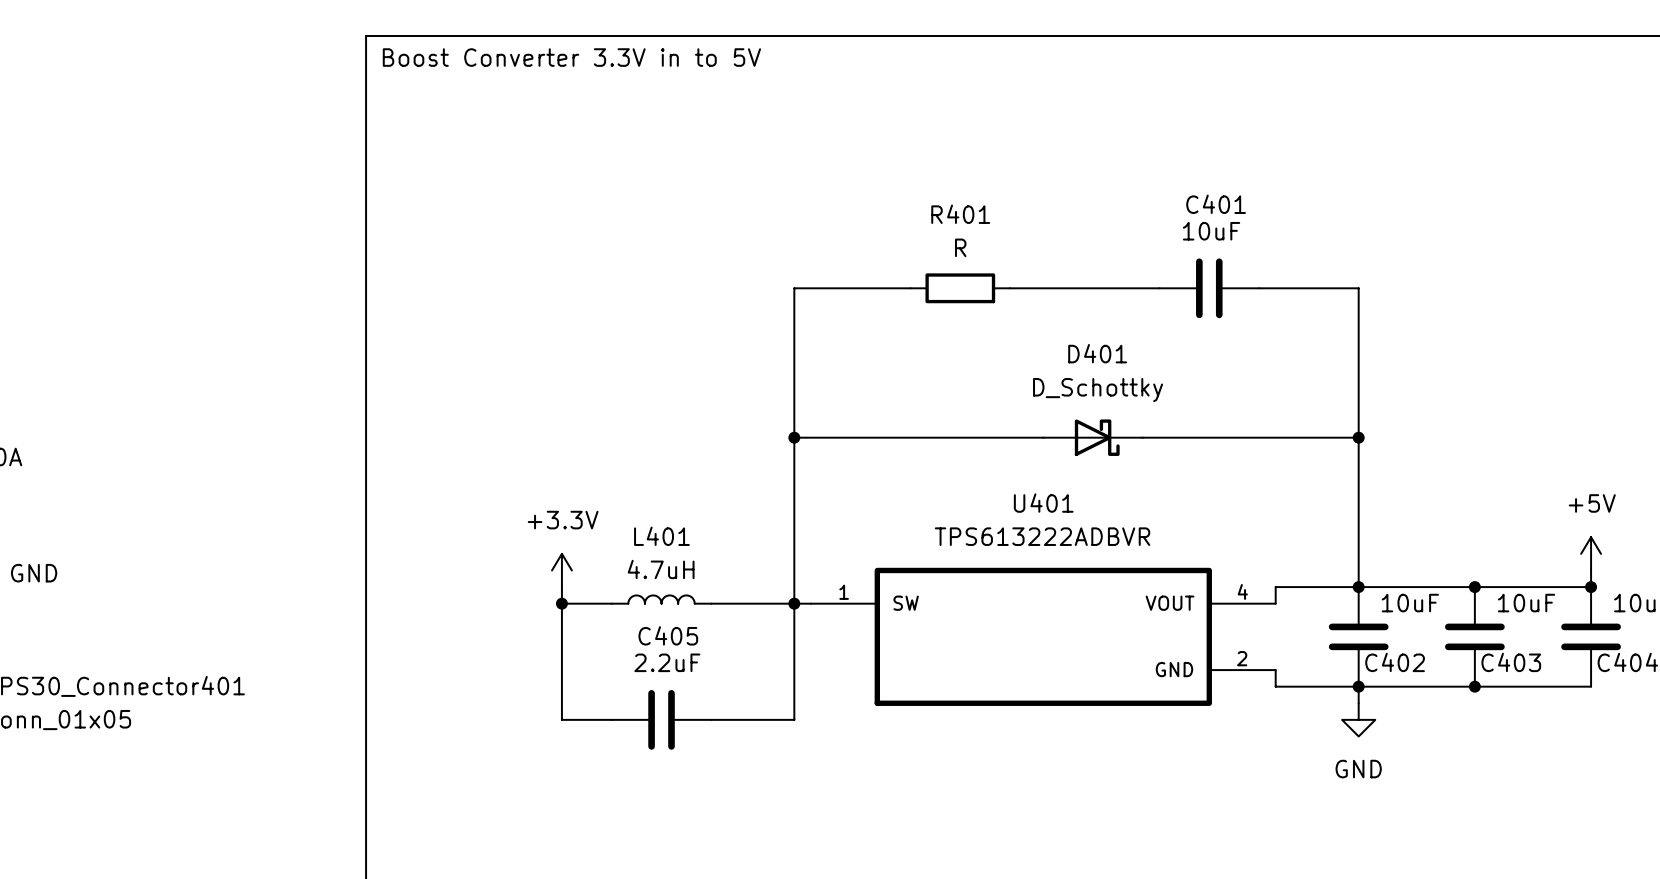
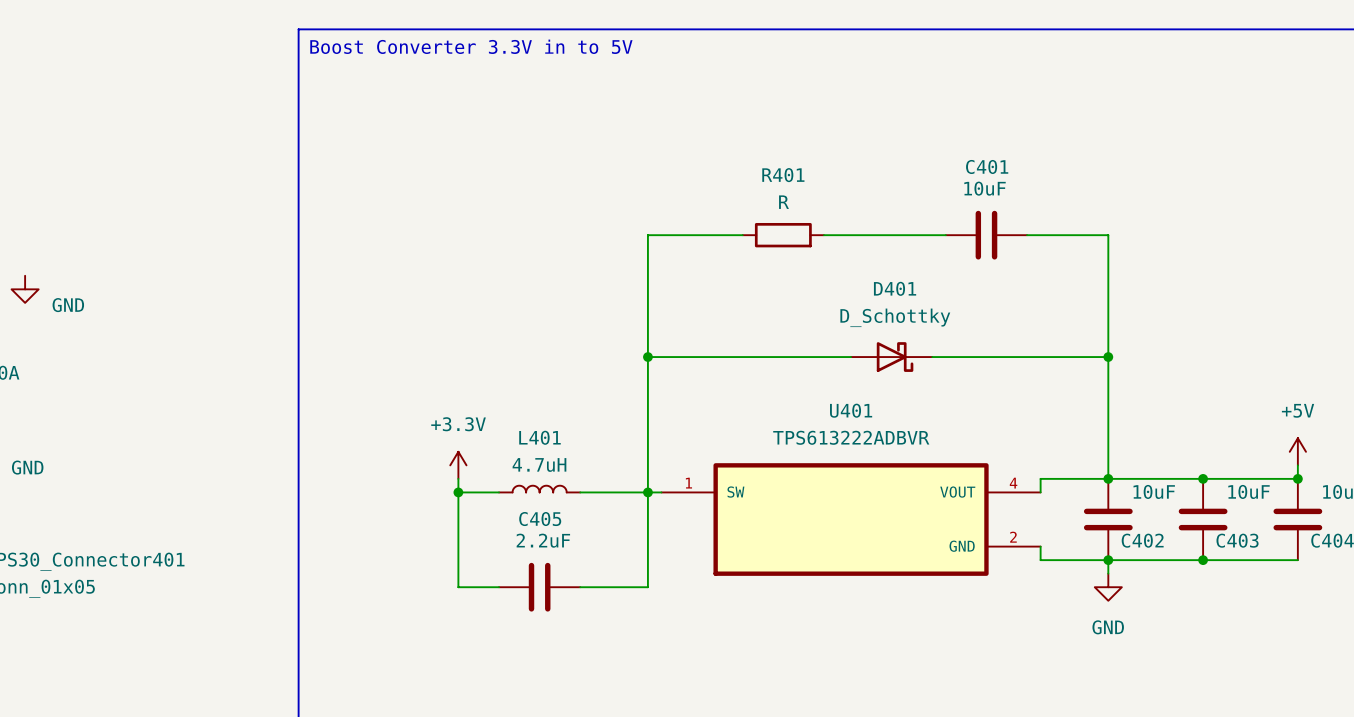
power symbol: none -> GND (25, 289)

